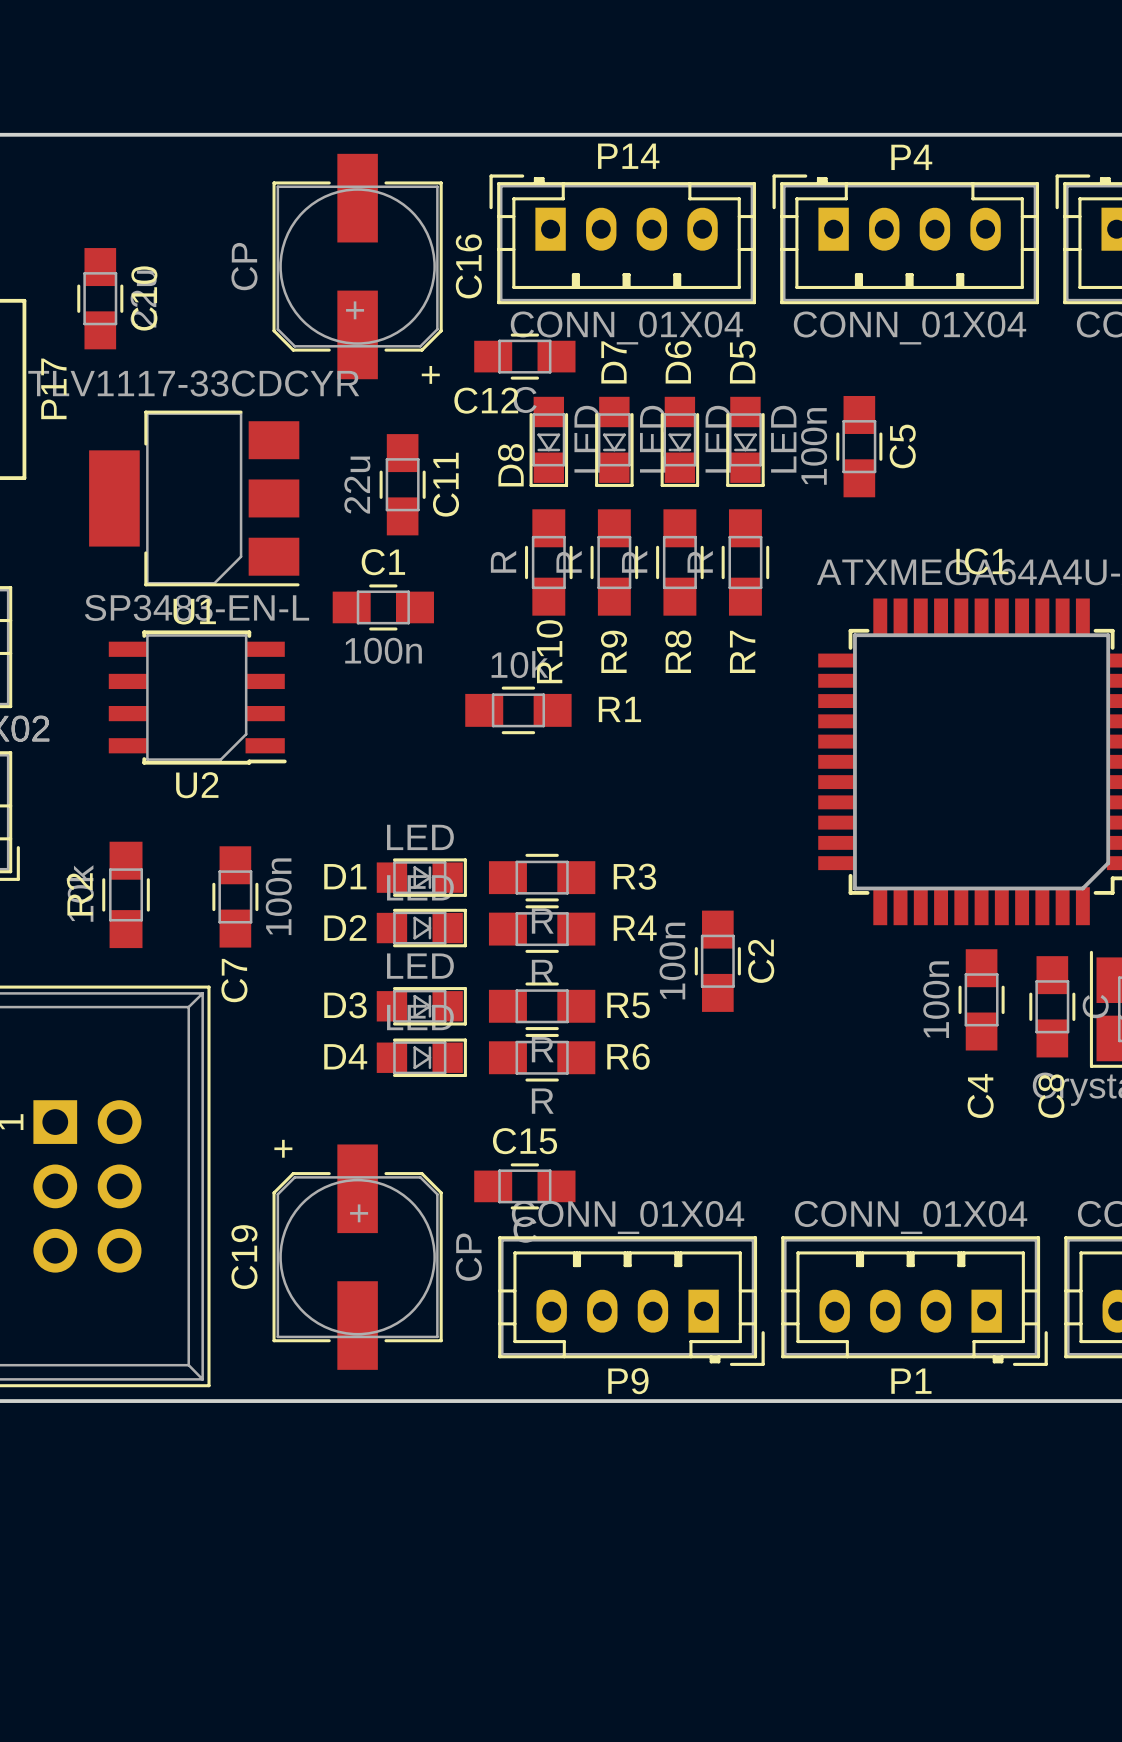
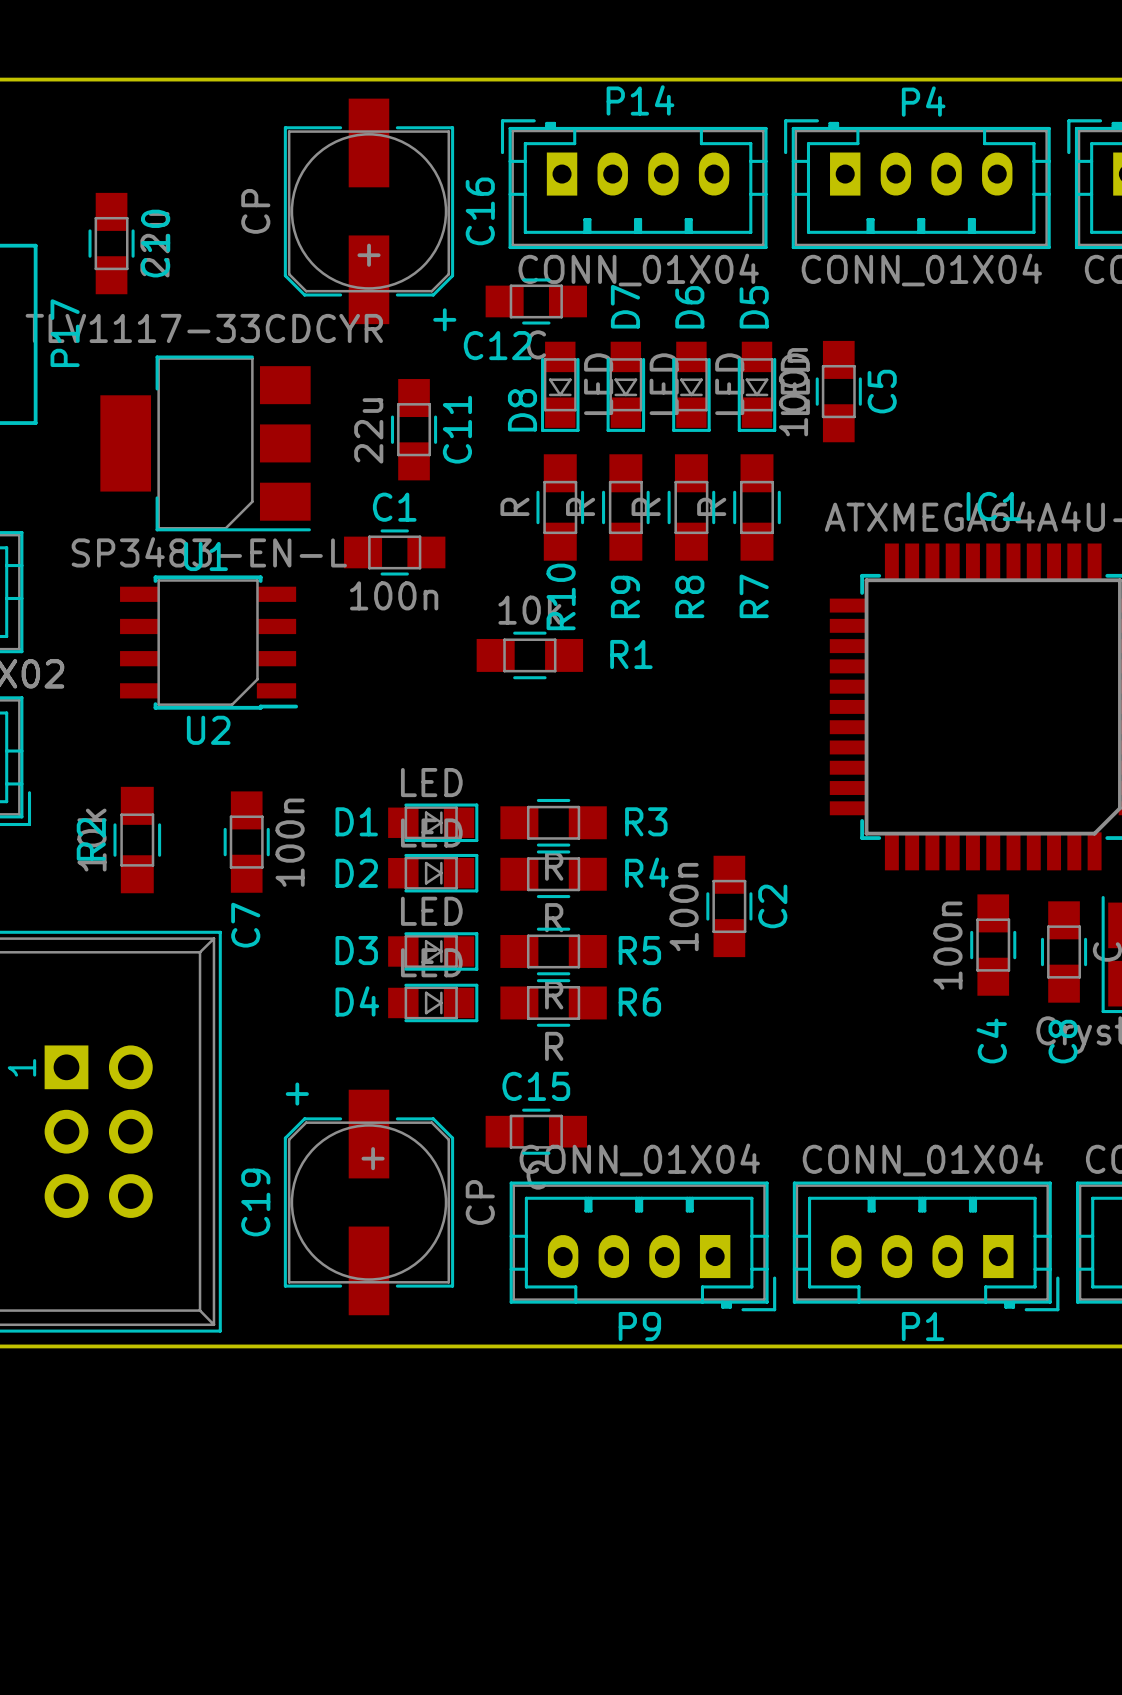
C5 position: (859, 446) -> (838, 391)

